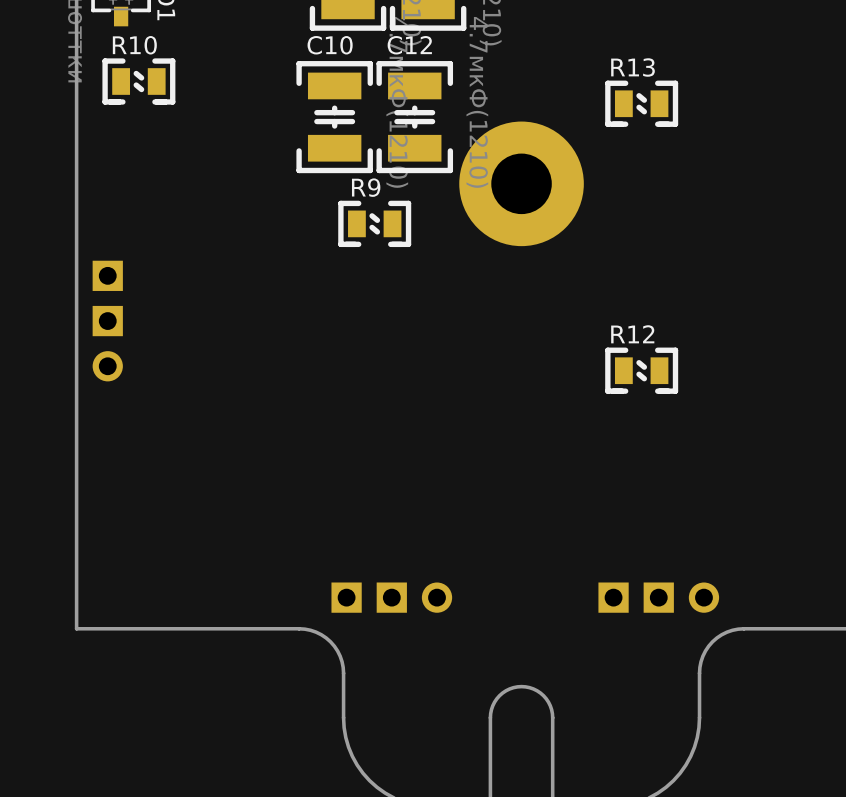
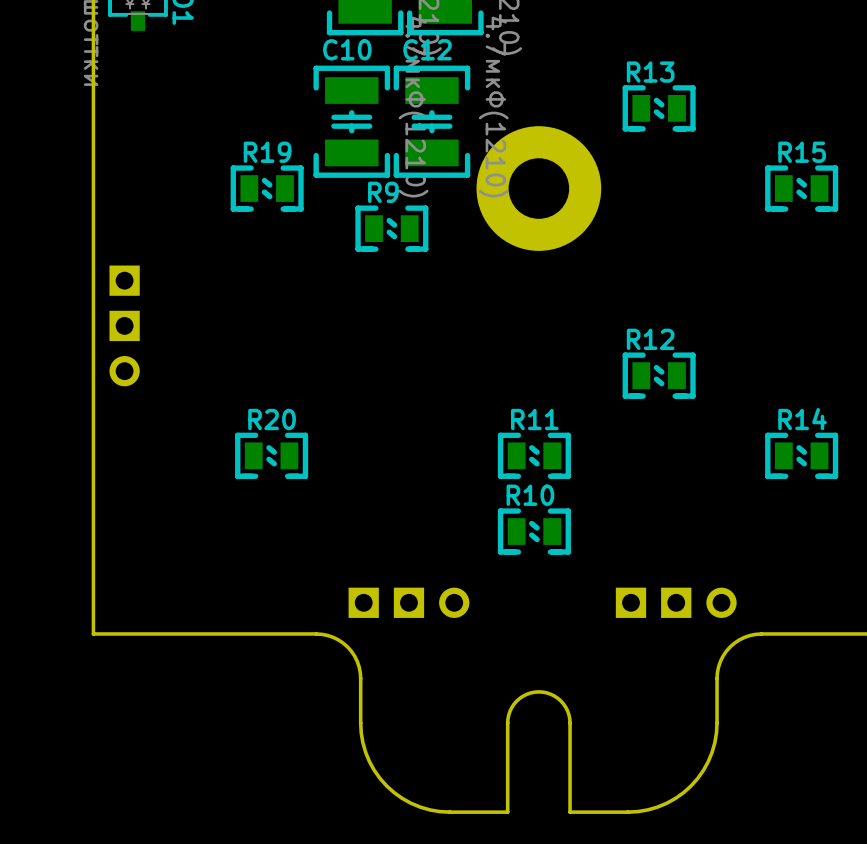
R10 position: (138, 81) -> (534, 531)
R19: none -> (267, 188)
R15: none -> (801, 188)
R20: none -> (271, 455)
R11: none -> (534, 455)
R14: none -> (801, 455)

